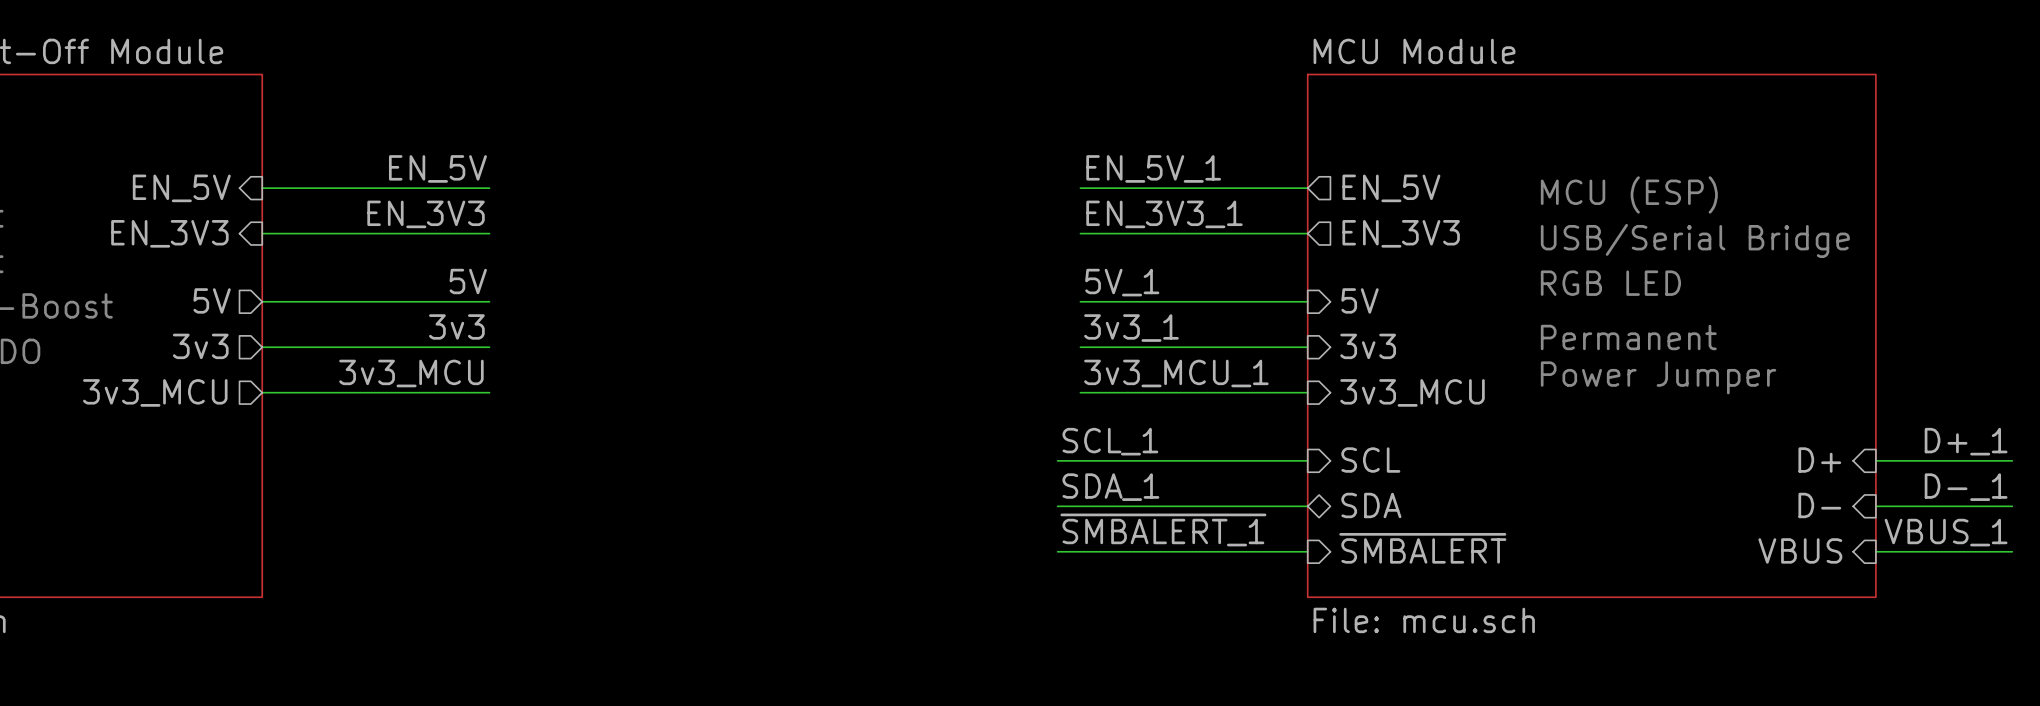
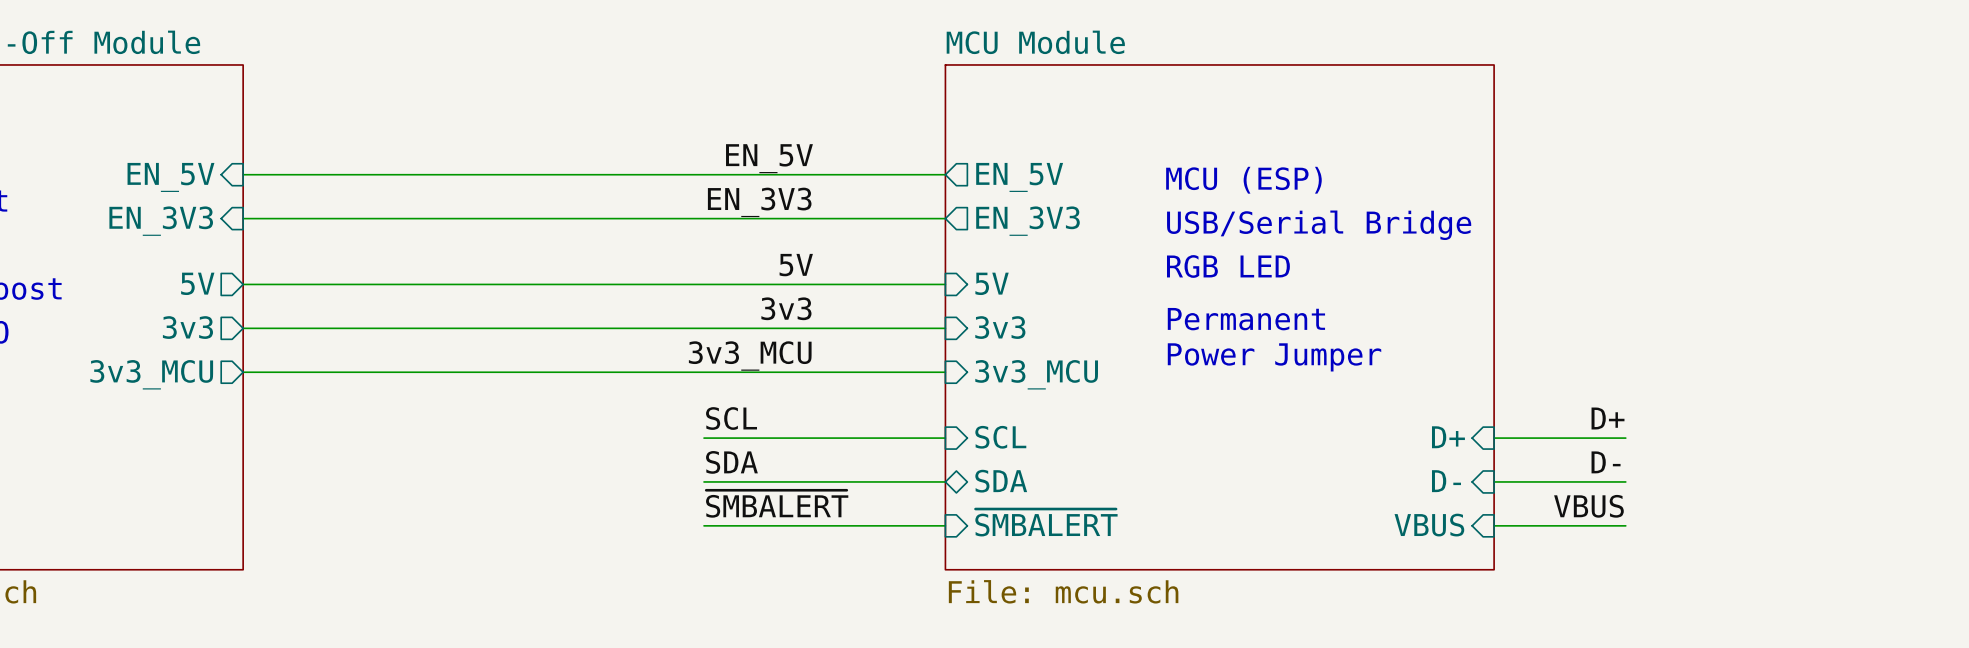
label position: EN_5V (437, 168) -> EN_5V (769, 158)
label: EN_5V_1 (1153, 168) -> none
wire: none -> (462, 174) (945, 174)
wire: (1080, 188) (1307, 188) -> none
sheet pin position: EN_5V (1391, 188) -> EN_5V (1019, 177)
text position: MCU (ESP) (1629, 194) -> MCU (ESP) (1243, 180)
label position: EN_3V3 (426, 214) -> EN_3V3 (759, 202)
label: EN_3V3_1 (1164, 214) -> none
wire: none -> (462, 218) (945, 218)
wire: (1080, 233) (1307, 233) -> none
sheet pin position: EN_3V3 (1401, 233) -> EN_3V3 (1027, 221)
text position: USB/Serial Bridge (1695, 240) -> USB/Serial Bridge (1319, 225)
label position: 5V (468, 281) -> 5V (796, 265)
label: 5V_1 (1122, 282) -> none
text position: RGB LED (1610, 283) -> RGB LED (1228, 266)
sheet pin position: 5V (1360, 300) -> 5V (992, 283)
wire: none -> (462, 284) (945, 284)
wire: (1080, 301) (1307, 301) -> none
label position: 3v3 (456, 326) -> 3v3 (786, 308)
label: 3v3_1 (1131, 328) -> none
sheet MCU Module position: (1591, 335) -> (1219, 317)
text position: Permanent (1628, 337) -> Permanent (1246, 319)
sheet pin position: 3v3 (1368, 346) -> 3v3 (1000, 327)
wire: none -> (462, 328) (945, 328)
wire: (1080, 347) (1307, 347) -> none
label position: 3v3_MCU (411, 373) -> 3v3_MCU (750, 356)
label: 3v3_MCU_1 (1176, 373) -> none
text position: Power Jumper (1658, 377) -> Power Jumper (1274, 357)
wire: none -> (462, 372) (945, 372)
wire: (1080, 392) (1307, 392) -> none
sheet pin position: 3v3_MCU (1412, 392) -> 3v3_MCU (1036, 374)
label: none -> SCL (731, 418)
label: none -> D+ (1608, 418)
label: SCL_1 (1110, 441) -> none
label: D+_1 (1966, 441) -> none
wire: (1057, 460) (1307, 460) -> (704, 438) (945, 438)
sheet pin position: SCL (1370, 460) -> SCL (1000, 437)
sheet pin position: D+ (1819, 460) -> D+ (1448, 437)
wire: (1875, 460) (2012, 460) -> (1494, 438) (1625, 438)
label: none -> SDA (731, 462)
label: none -> D- (1606, 462)
label: SDA_1 (1110, 487) -> none
label: D-_1 (1966, 487) -> none
sheet pin position: SDA (1371, 505) -> SDA (1001, 481)
sheet pin position: D- (1819, 505) -> D- (1446, 481)
wire: (1057, 506) (1307, 506) -> (704, 481) (945, 481)
wire: (1875, 506) (2012, 506) -> (1494, 481) (1625, 481)
label: none -> ~{SMBALERT} (777, 503)
label: ~{SMBALERT_1} (1163, 529) -> none
label: none -> VBUS (1588, 506)
label: VBUS_1 (1946, 532) -> none
sheet pin position: ~{SMBALERT} (1422, 548) -> ~{SMBALERT} (1046, 522)
sheet pin position: VBUS (1800, 550) -> VBUS (1429, 525)
wire: (1057, 551) (1307, 551) -> (704, 525) (945, 525)
wire: (1875, 551) (2012, 551) -> (1494, 525) (1625, 525)

